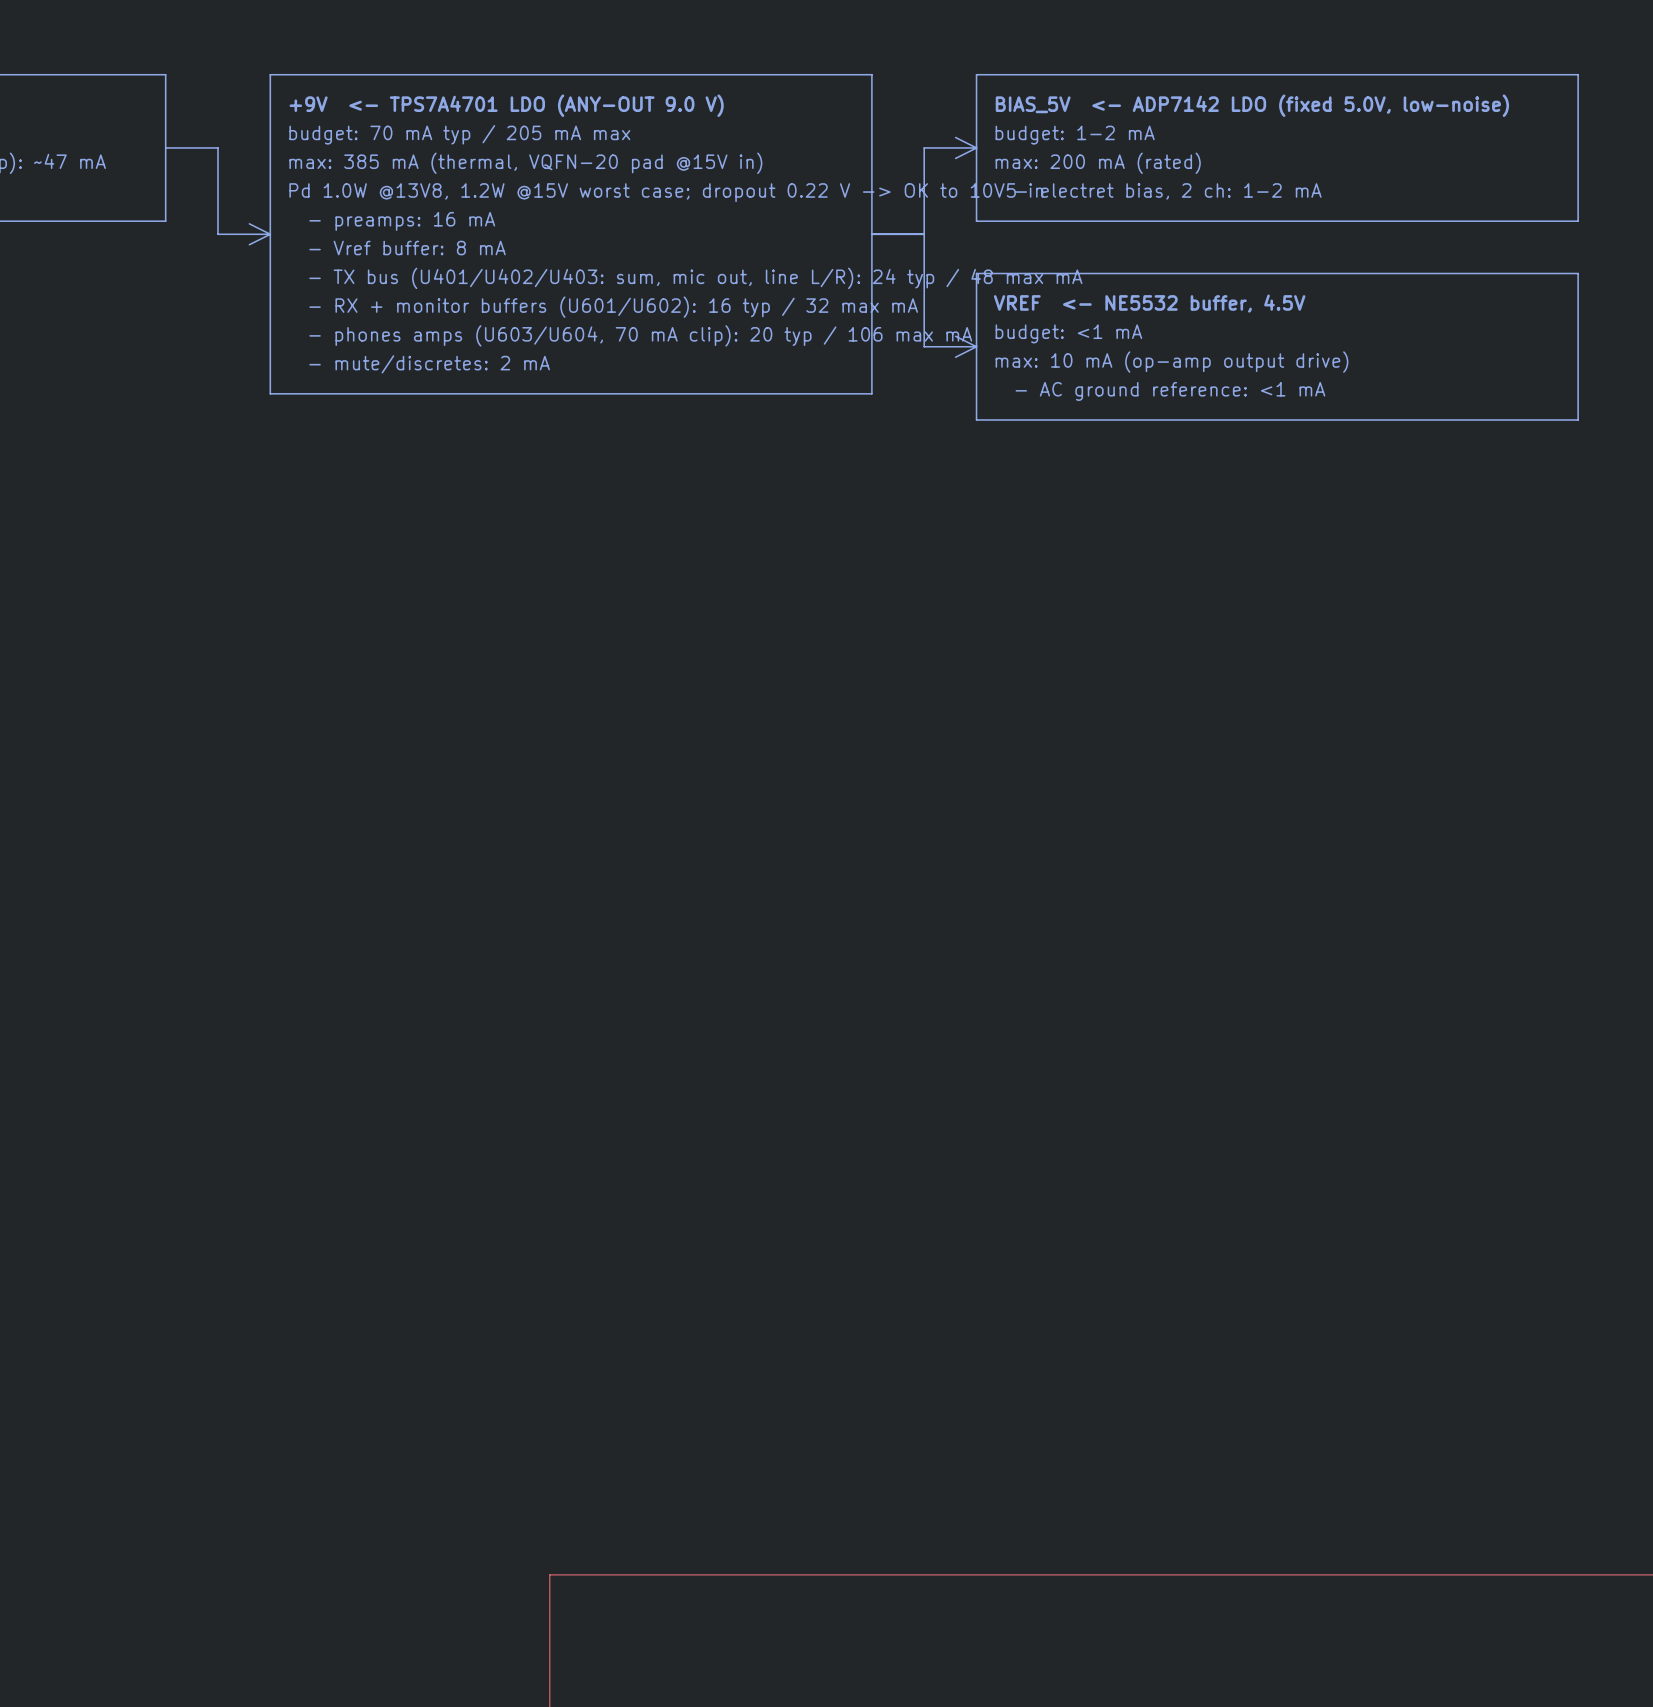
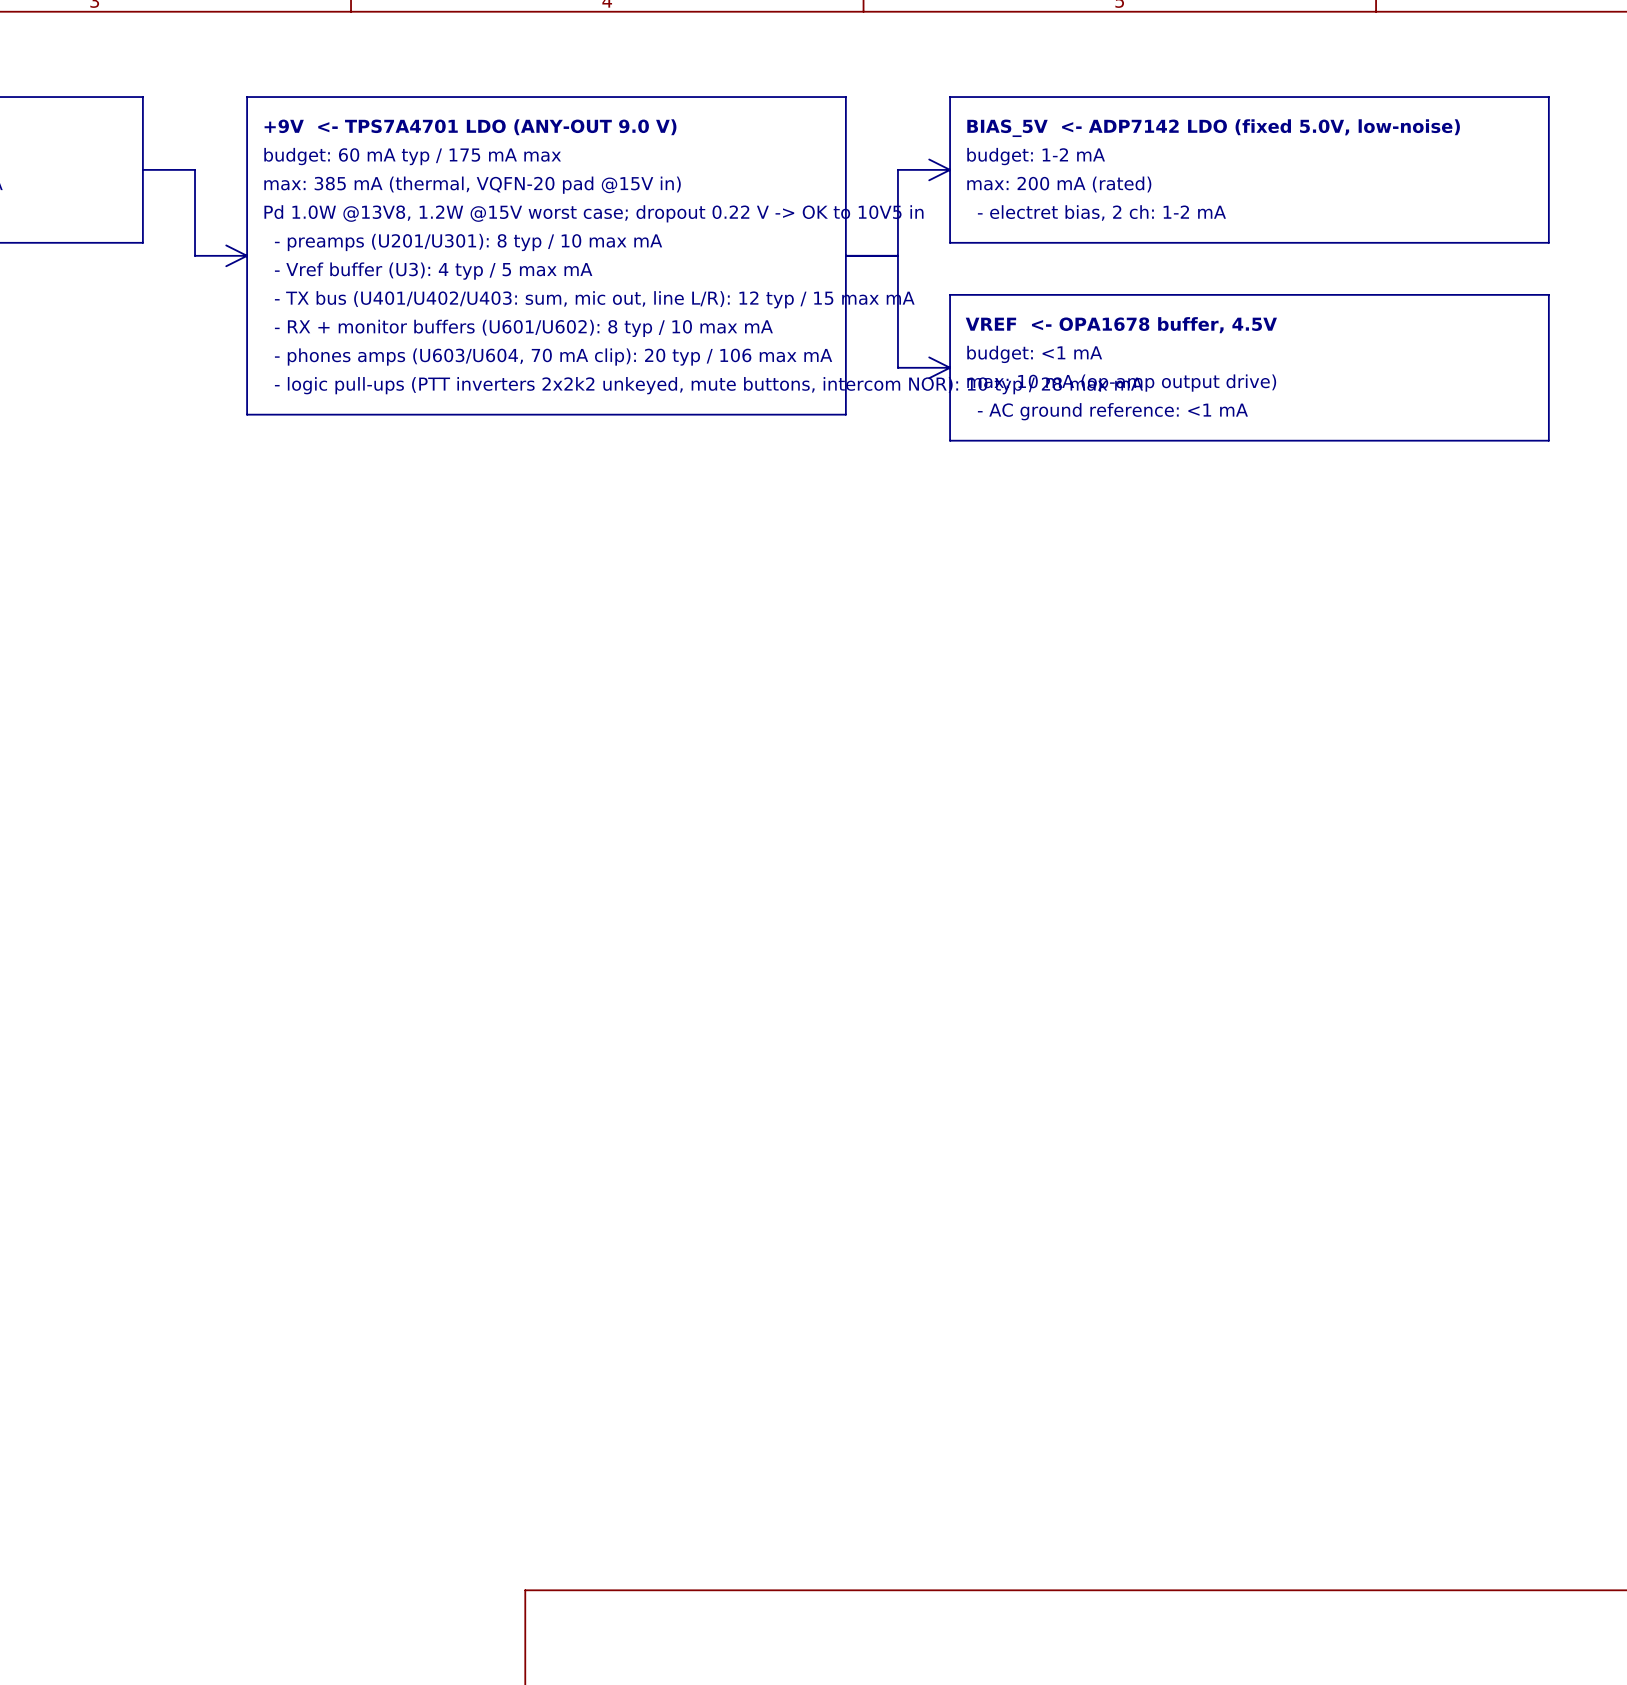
text: budget: 70 mA typ / 205 mA max (459, 134) -> budget: 60 mA typ / 175 mA max (412, 156)
text: - preamps: 16 mA (402, 221) -> - preamps (U201/U301): 8 typ / 10 max mA (468, 242)
text: - Vref buffer: 8 mA (407, 248) -> - Vref buffer (U3): 4 typ / 5 max mA (433, 271)
text: - TX bus (U401/U402/U403: sum, mic out, line L/R): 24 typ / 48 max mA (695, 278) -> - TX bus (U401/U402/U403: sum, mic out, line L/R): 12 typ / 15 max mA (594, 299)
text: VREF <- NE5532 buffer, 4.5V (1149, 303) -> VREF <- OPA1678 buffer, 4.5V (1121, 325)
text: - RX + monitor buffers (U601/U602): 16 typ / 32 max mA (613, 307) -> - RX + monitor buffers (U601/U602): 8 typ / 10 max mA (523, 328)
text: - mute/discretes: 2 mA (429, 364) -> - logic pull-ups (PTT inverters 2x2k2 unkeyed, mute buttons, intercom NOR): 10 typ / 28 max mA (708, 385)

